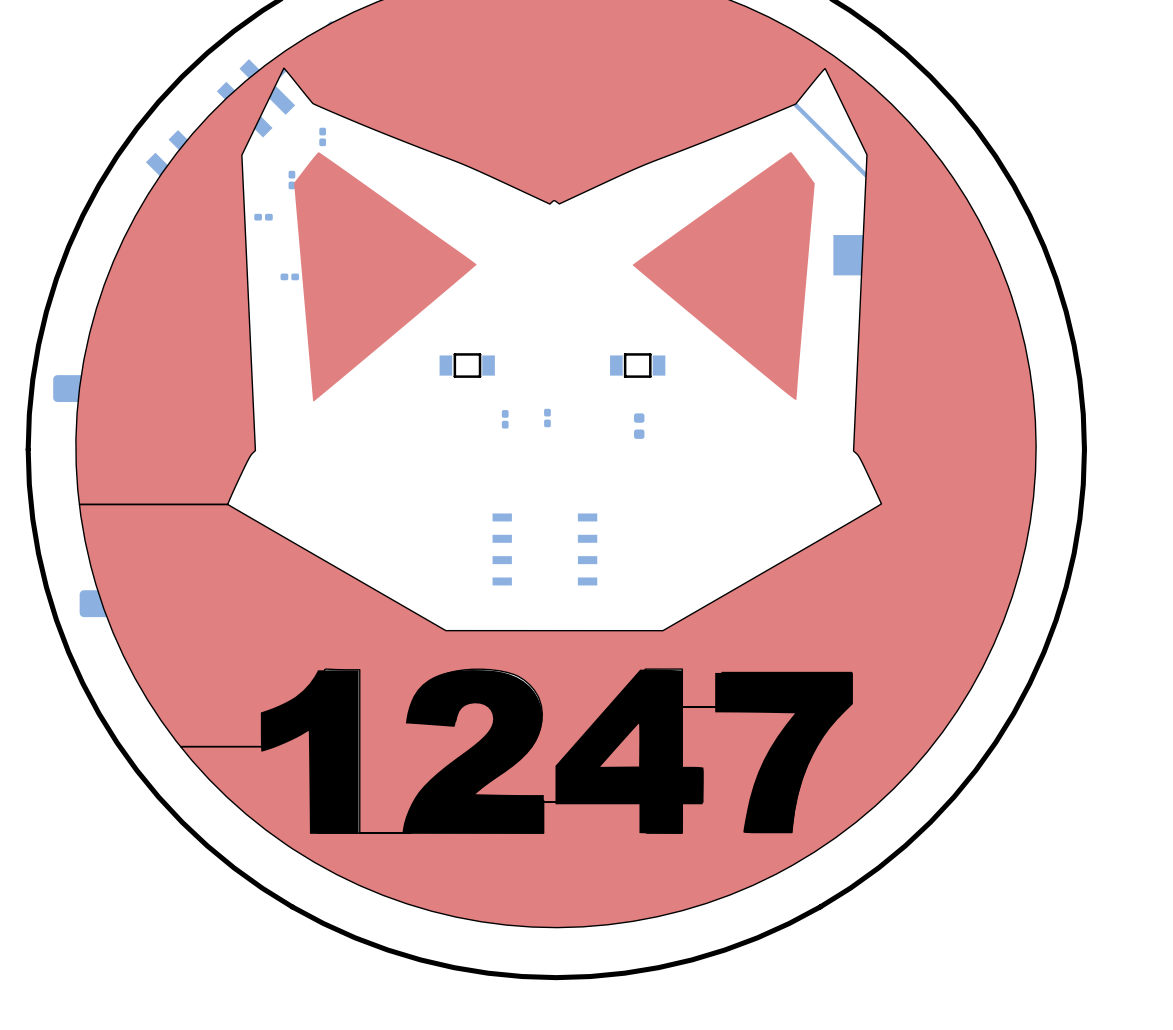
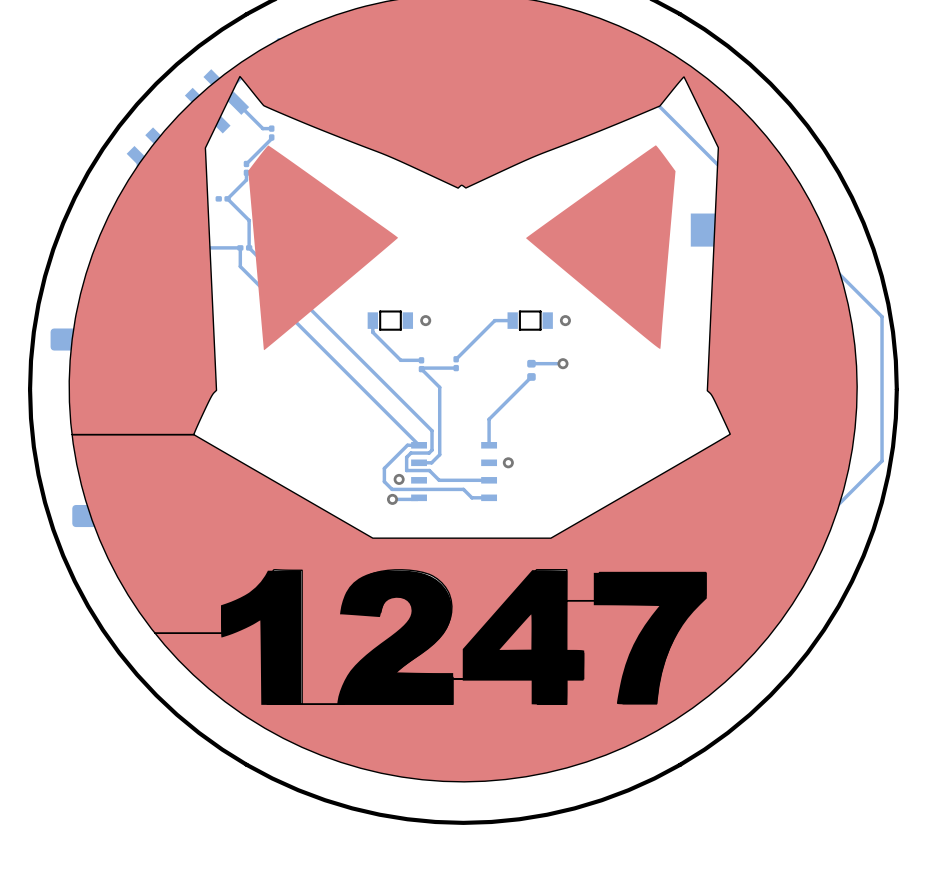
bottom track: none -> (215, 80) (215, 102) (198, 119) (198, 170) (191, 178) (173, 178) (152, 157) (138, 157) (138, 209) (176, 247) (240, 247) (240, 266) (419, 445) (407, 445) (384, 468) (384, 481) (392, 489) (463, 489) (471, 497) (489, 497)
bottom track: none -> (237, 103) (262, 128) (271, 128)
bottom track: none -> (271, 137) (246, 163)
bottom track: none -> (246, 172) (246, 179) (227, 198) (249, 220) (249, 247) (432, 430) (432, 450) (429, 453) (410, 453) (406, 457) (406, 470) (429, 470) (439, 480) (489, 480)
bottom track: none -> (732, 230) (795, 230) (882, 316) (882, 461) (792, 550) (731, 550)
bottom track: none -> (372, 320) (372, 332) (400, 360) (421, 360)
via: none -> (425, 320)
bottom track: none -> (512, 320) (494, 320) (456, 359)
via: none -> (565, 320)
bottom track: none -> (531, 363) (562, 363)
via: none -> (562, 363)
bottom track: none -> (456, 368) (421, 369) (439, 387) (439, 454) (431, 462) (418, 462)
bottom track: none -> (531, 376) (489, 419) (489, 445)
via: none -> (508, 462)
via: none -> (399, 479)
bottom track: none -> (419, 497) (392, 499)
via: none -> (392, 499)

